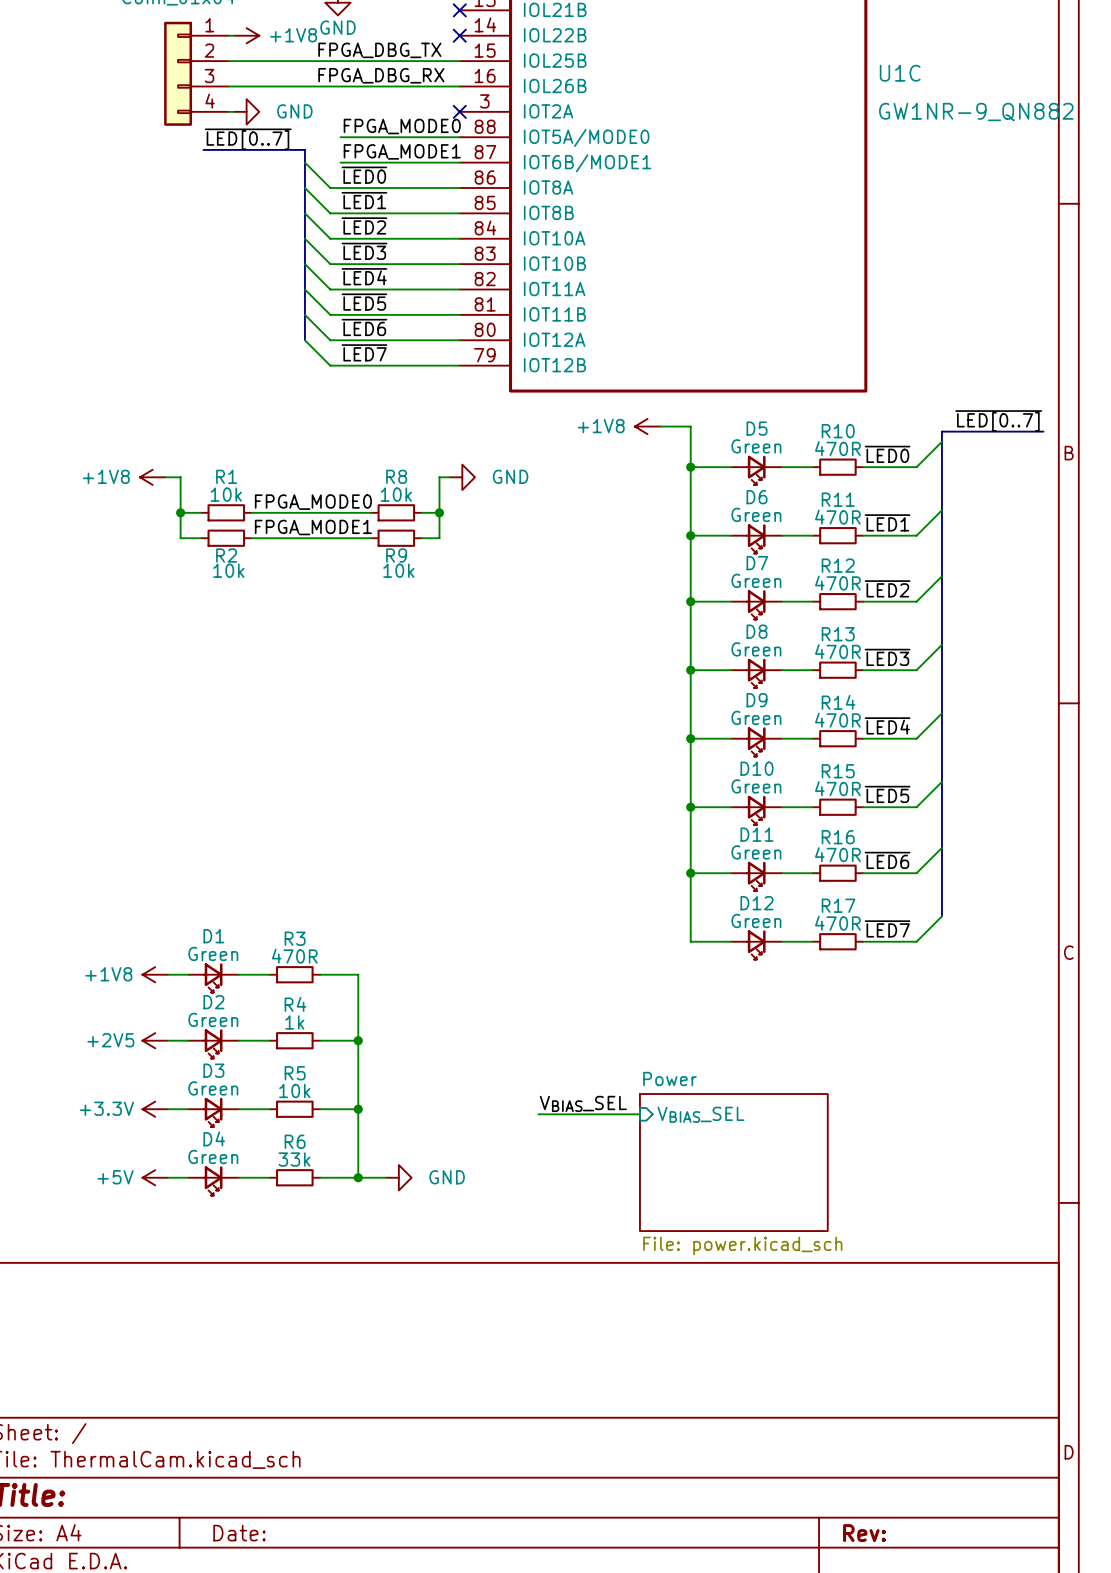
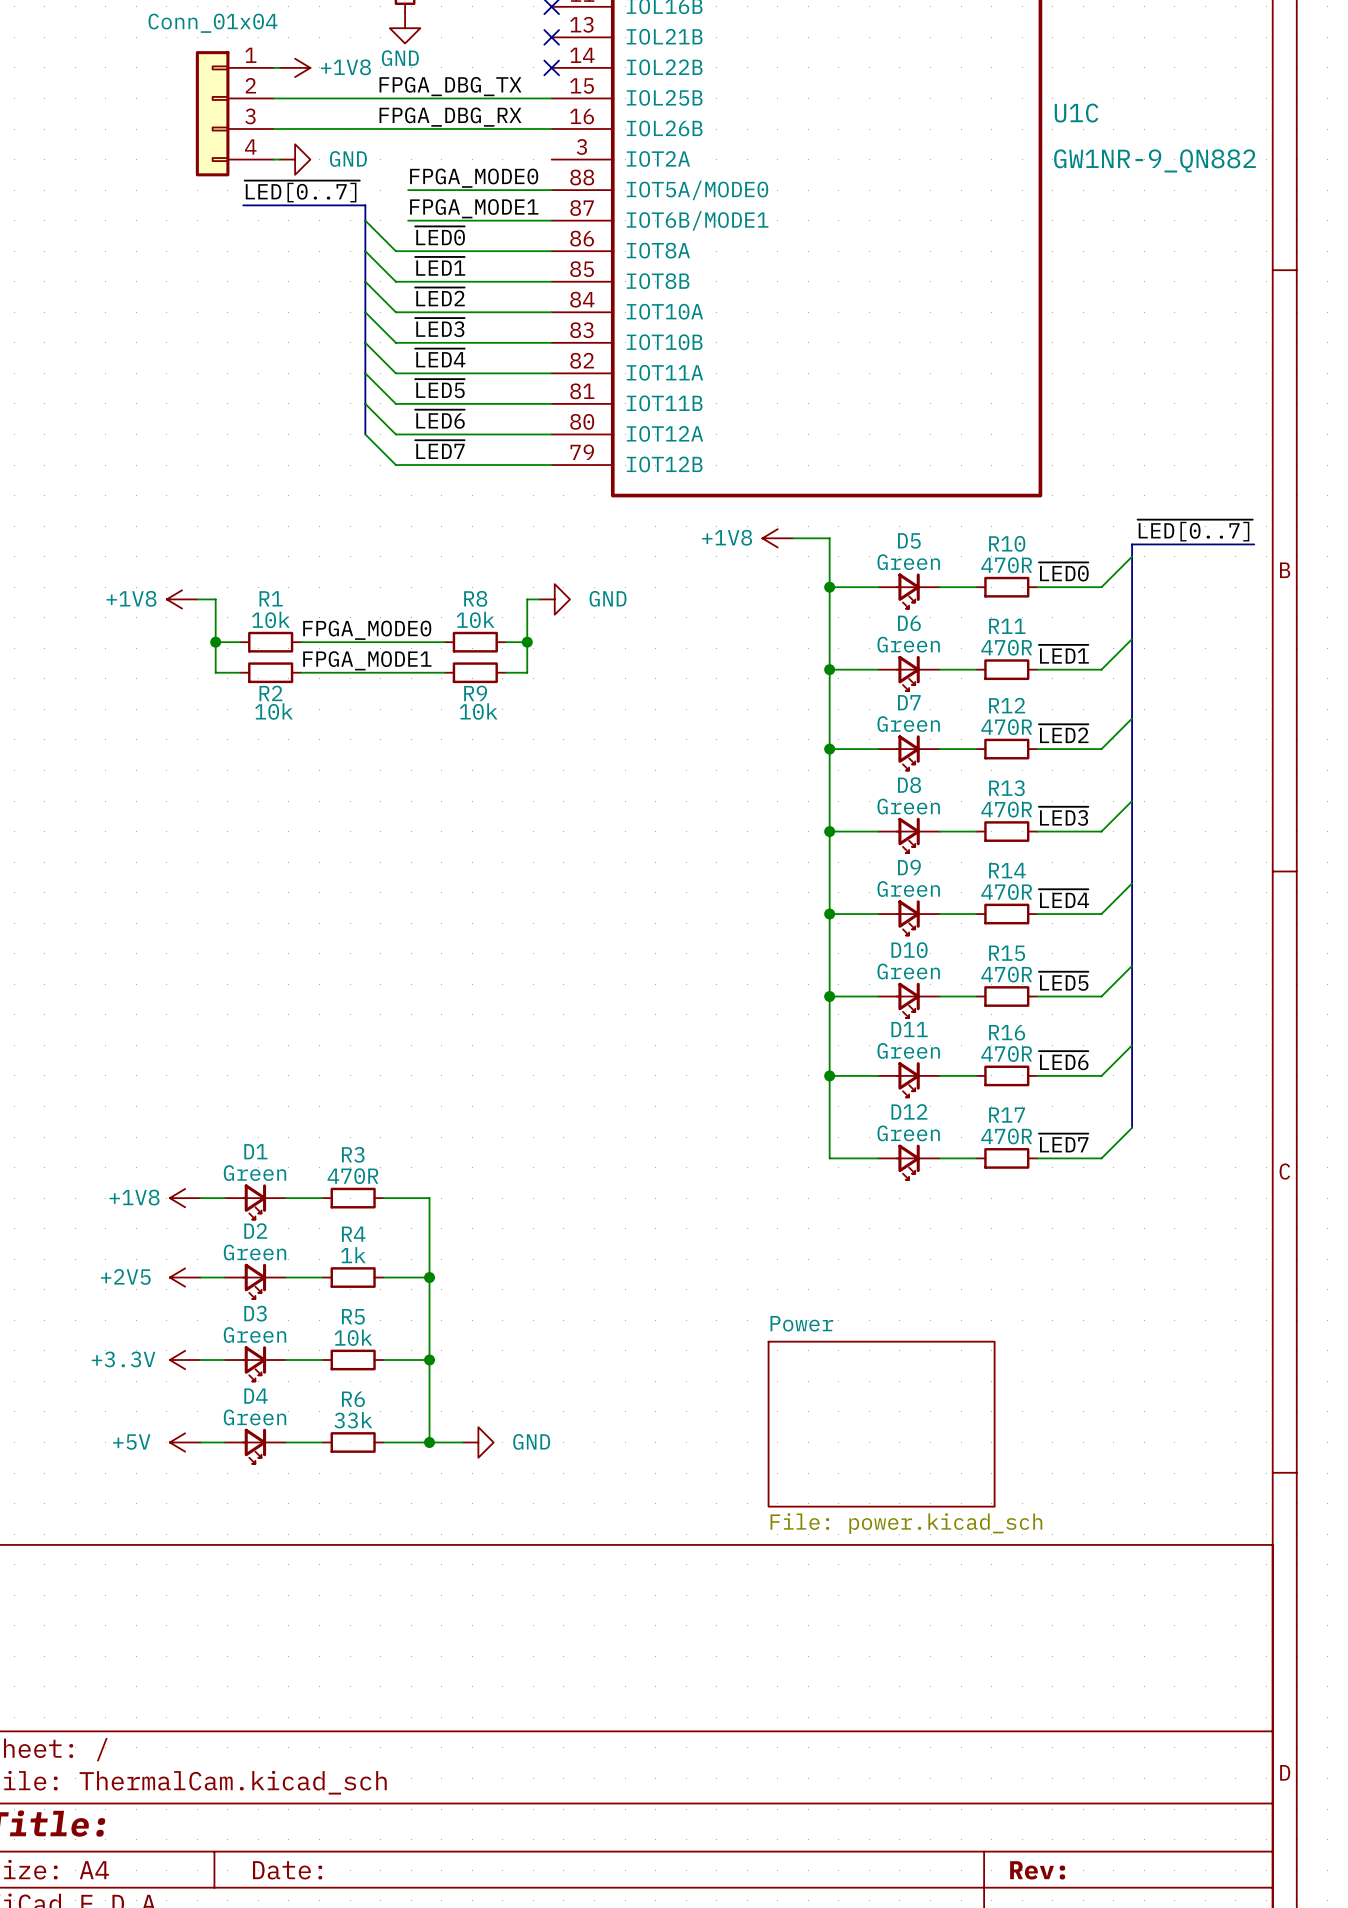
no-connect mark: (459, 111) -> none
label: VBIAS_SEL (583, 1103) -> none
wire: (538, 1114) (639, 1114) -> none
sheet pin: VBIAS_SEL (700, 1114) -> none

